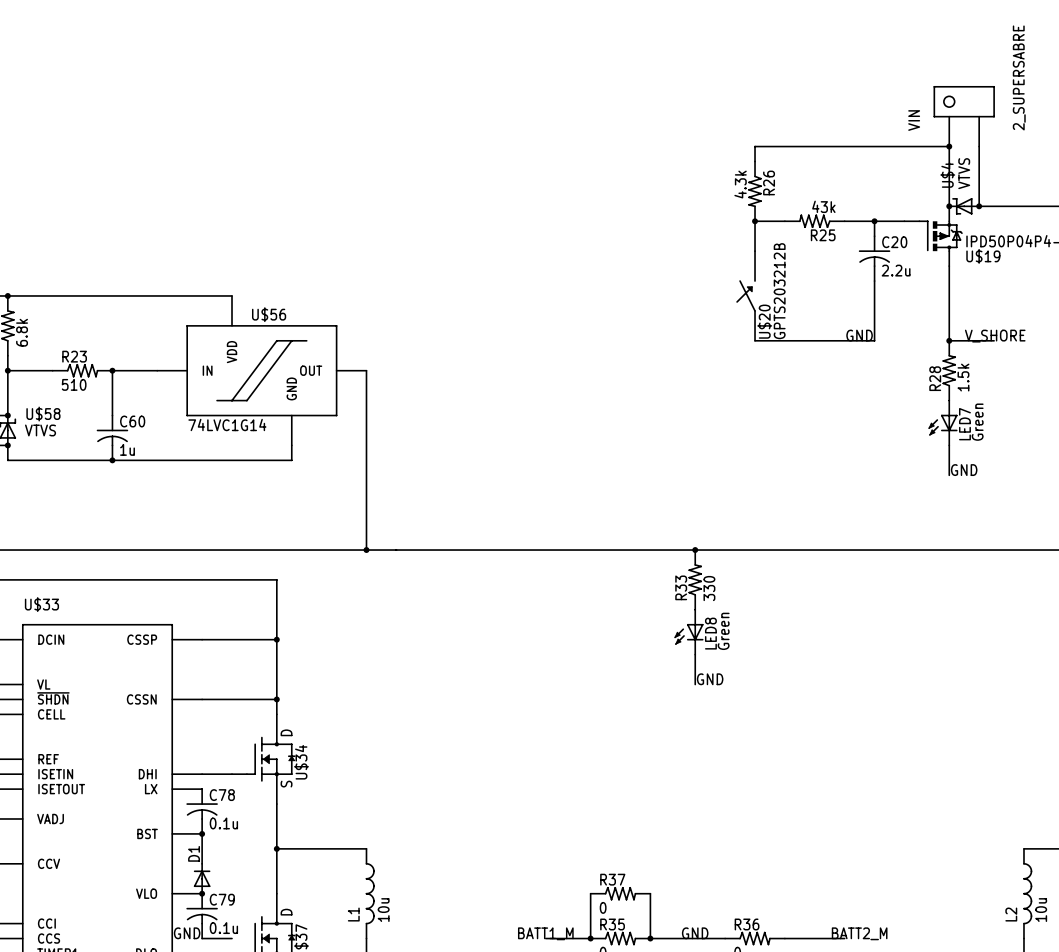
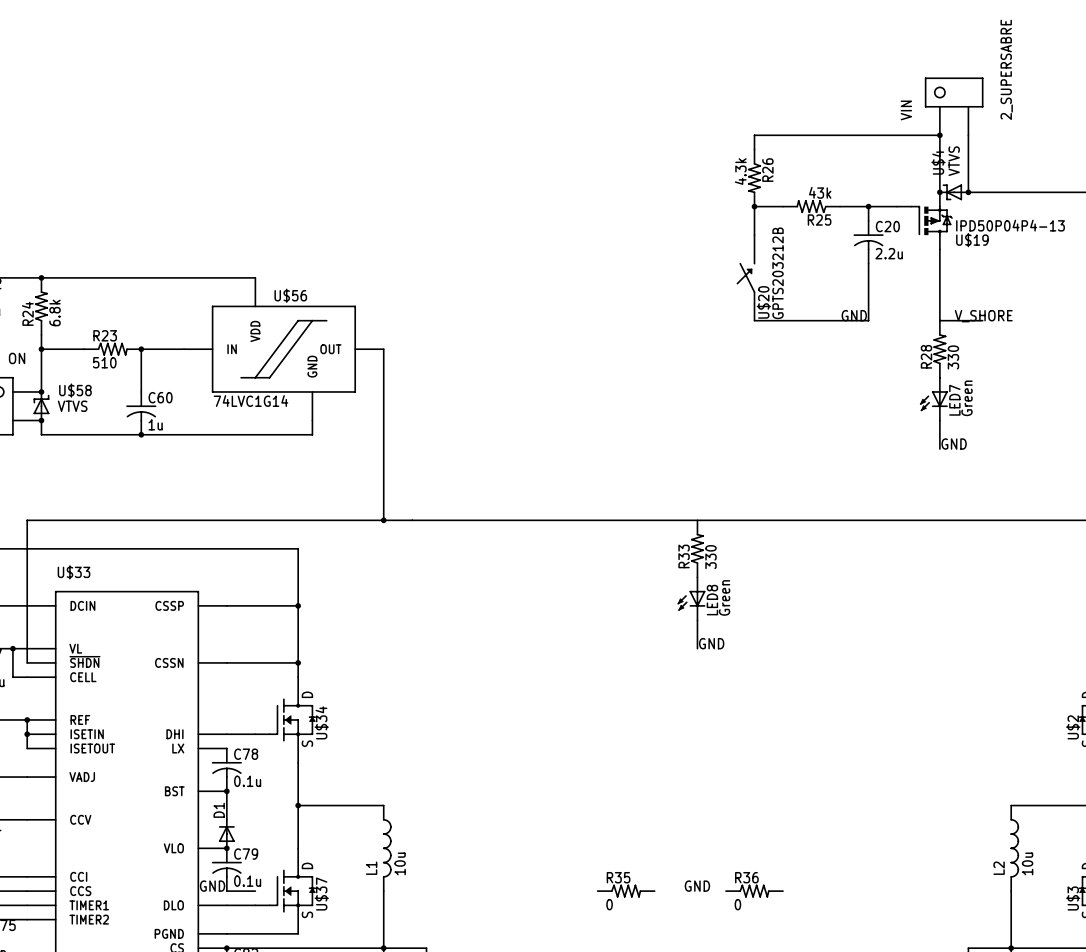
junction: (949, 340) -> none
R28 value: 1.5k (963, 377) -> 330 (953, 357)
junction: (695, 550) -> none
wire: (590, 893) (590, 938) (545, 938) -> none
R37: 0 (620, 893) -> none
wire: (650, 893) (650, 938) (725, 938) -> none
label: BATT1_M (545, 933) -> none
label: BATT2_M (859, 933) -> none
junction: (590, 938) -> none
junction: (650, 938) -> none
wire: (784, 938) (844, 938) -> none

